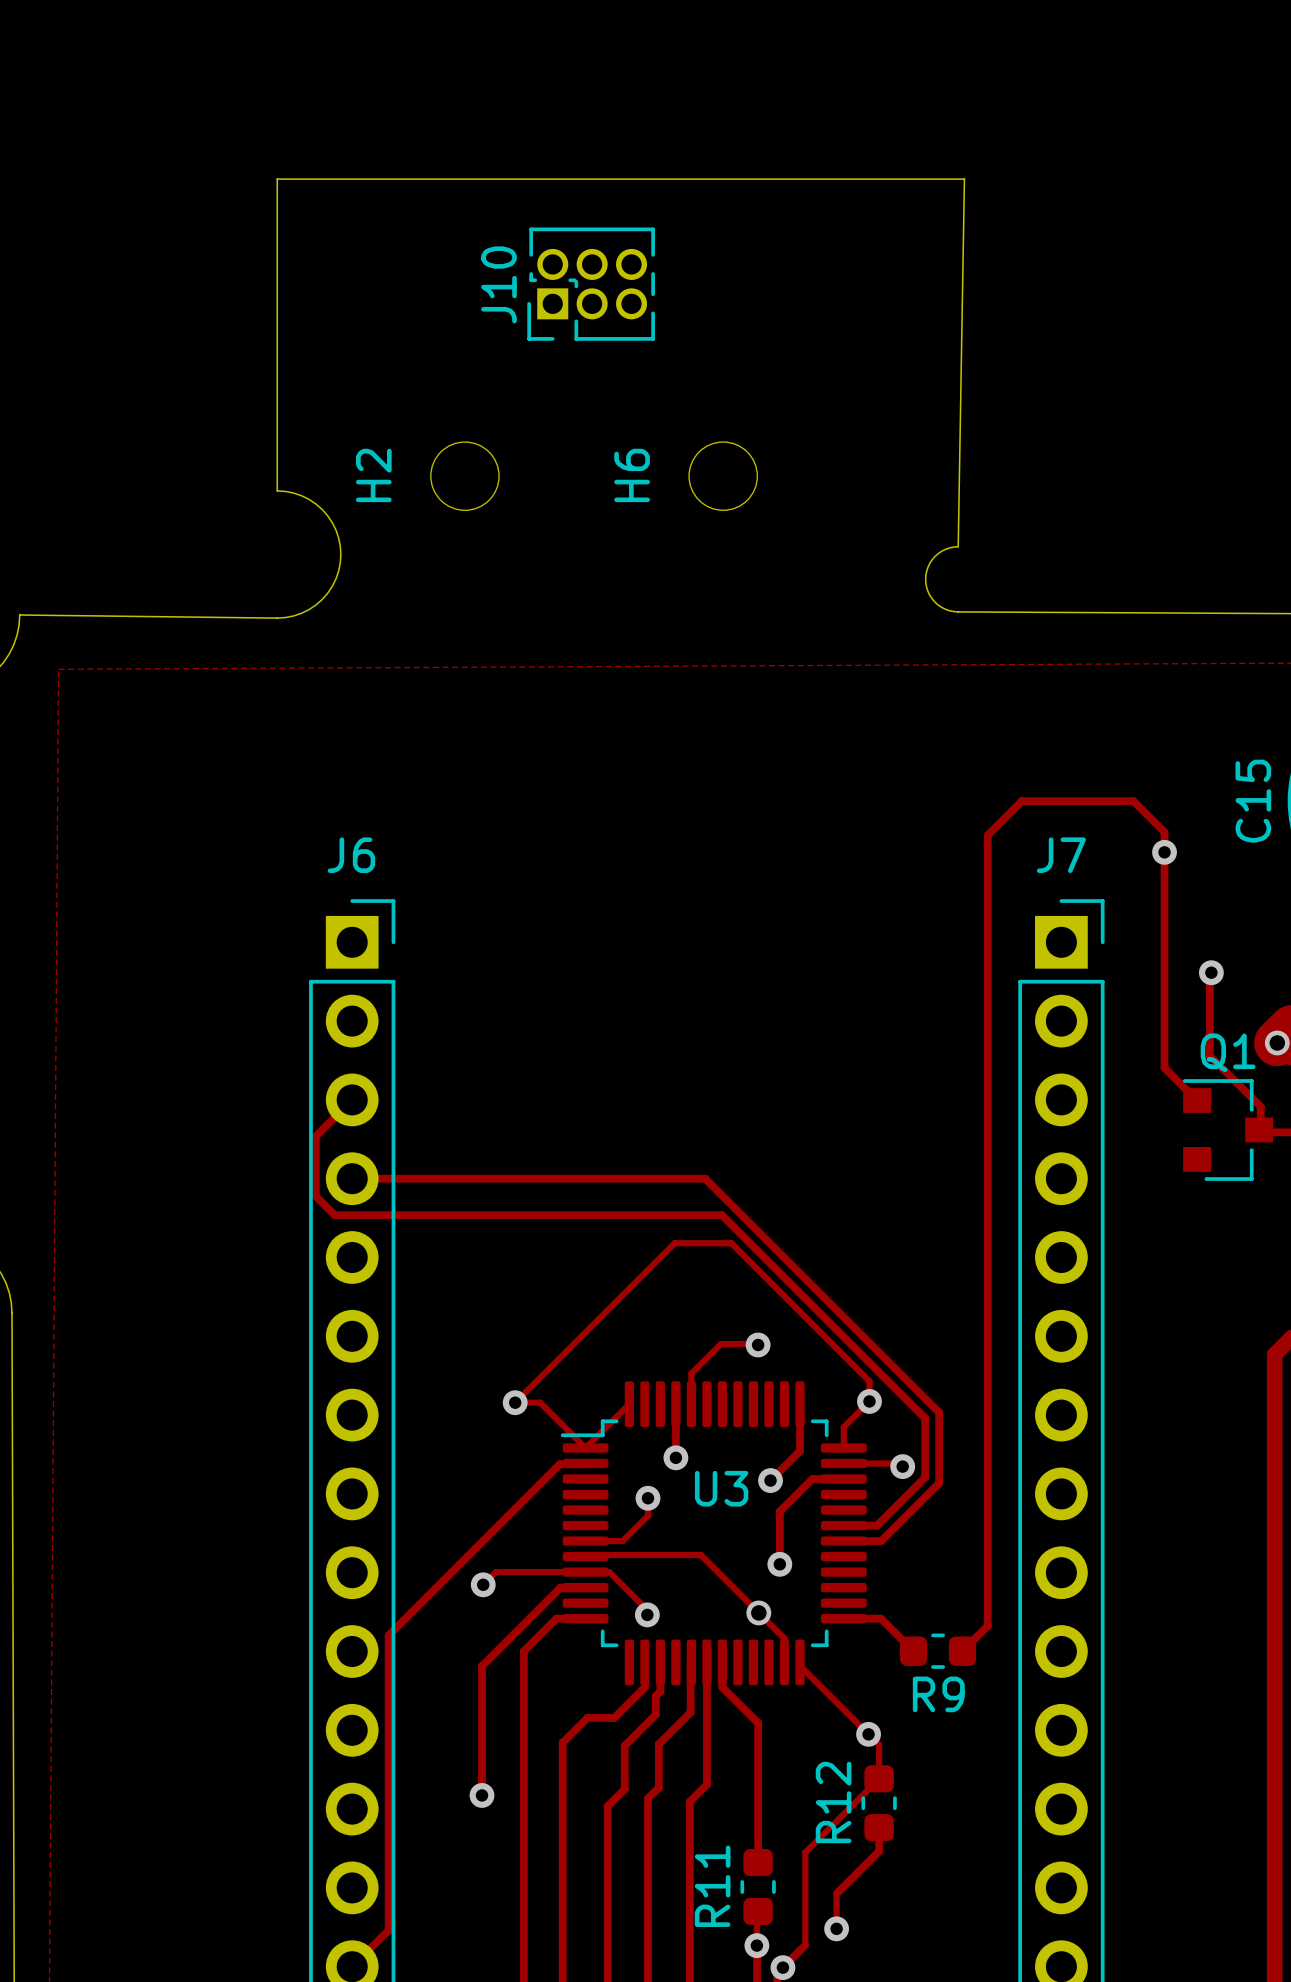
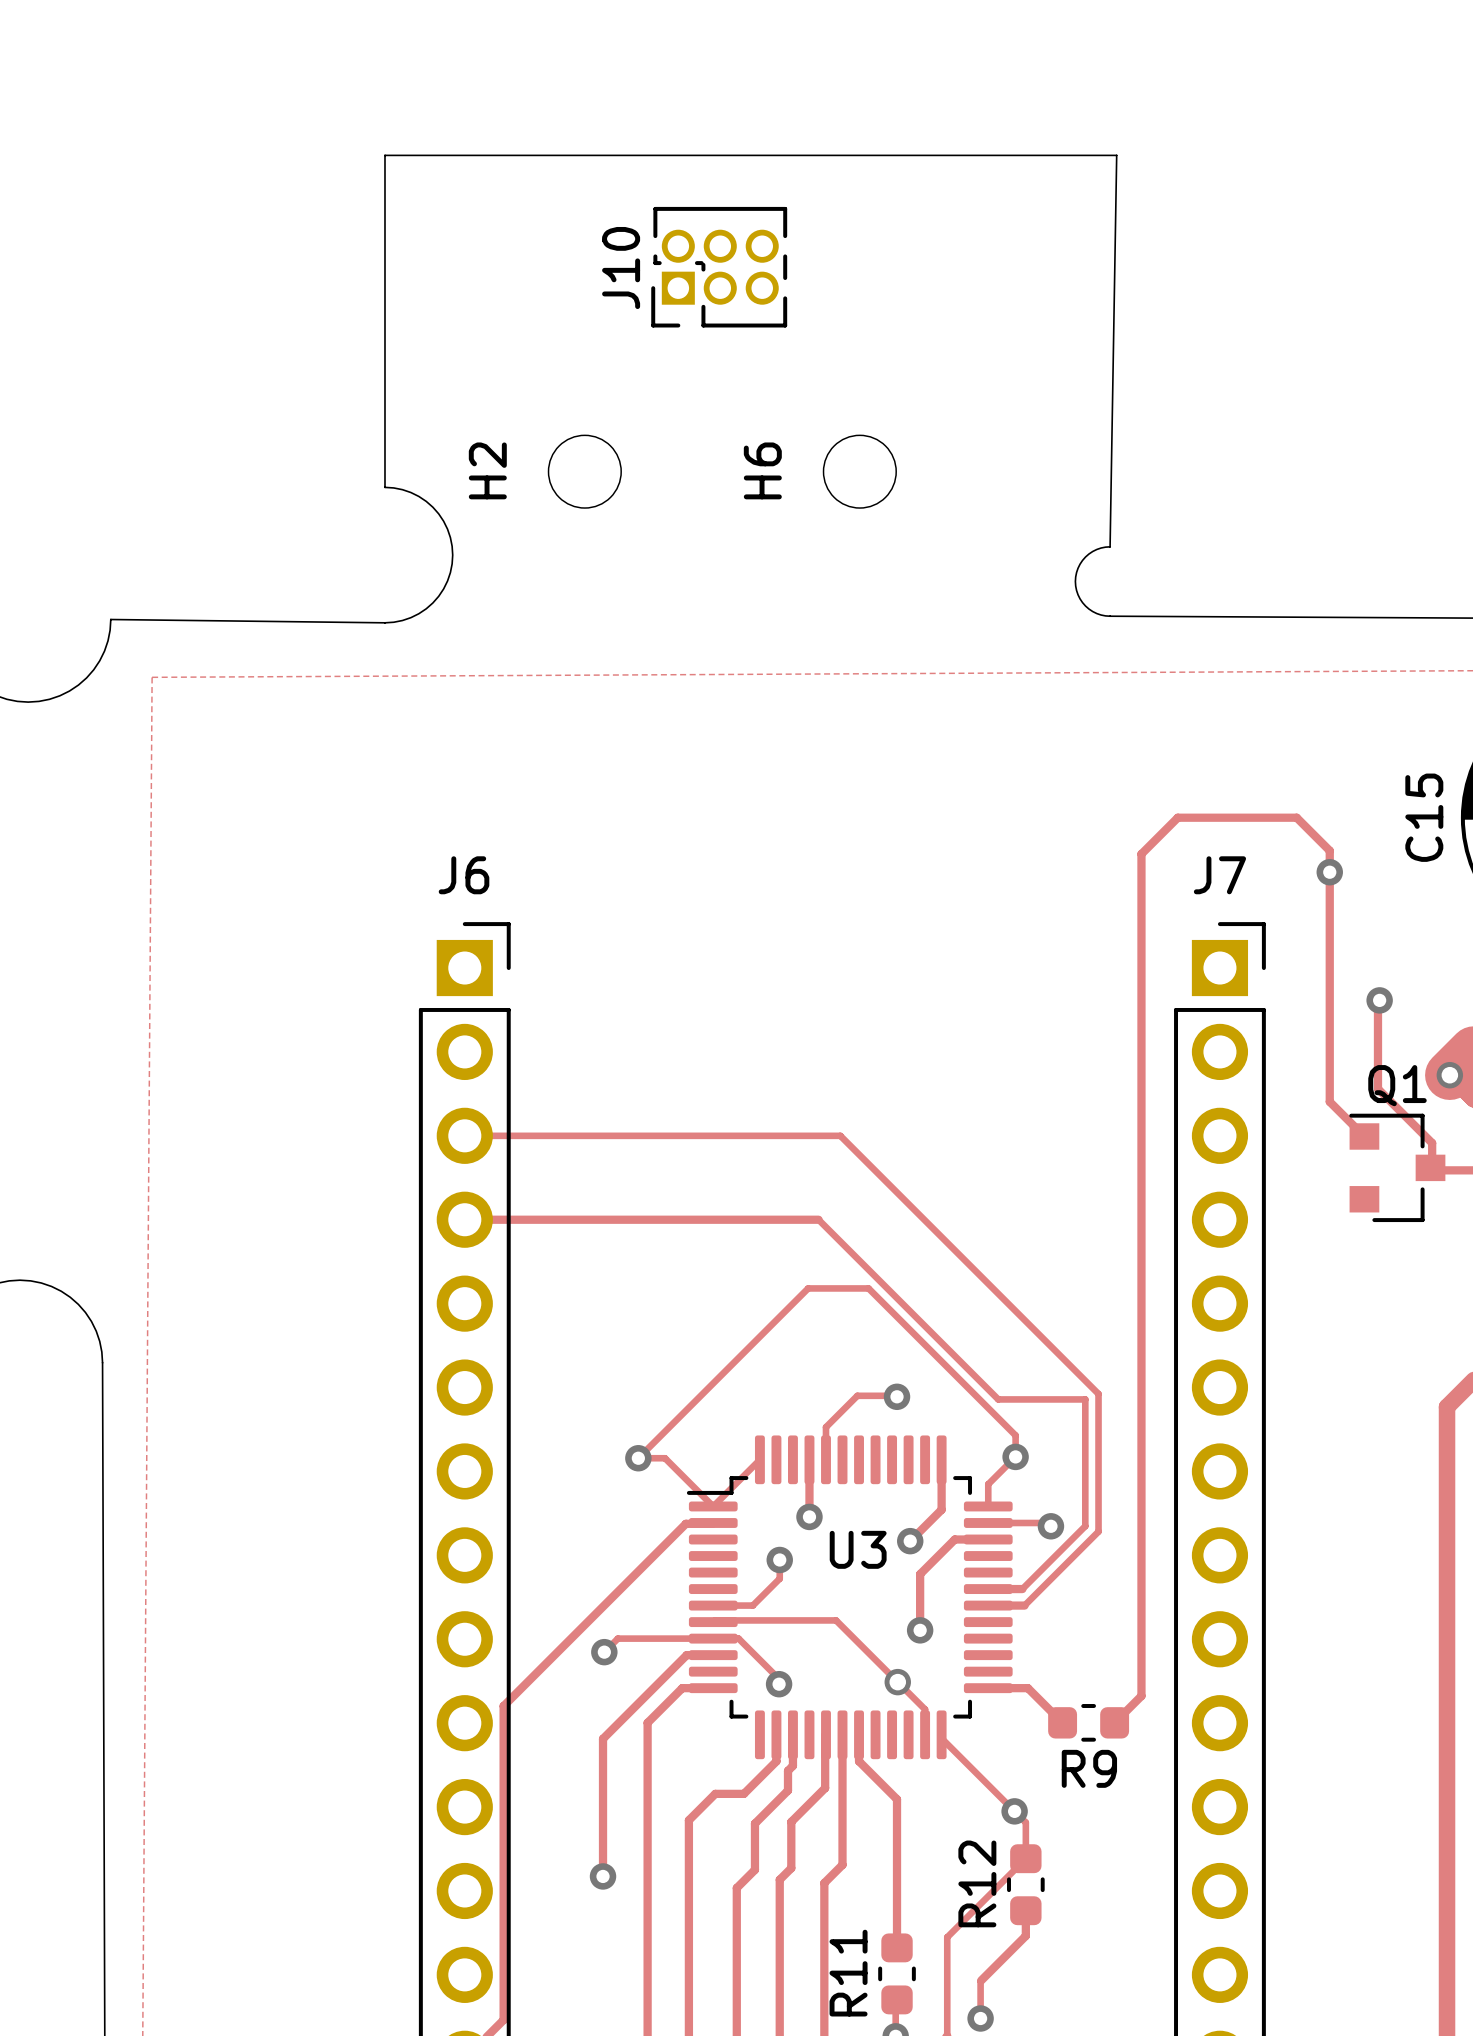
track: (352, 1099) (315, 1136) (315, 1196) (334, 1215) (722, 1215) (925, 1418) (925, 1477) (875, 1525) -> (464, 1135) (840, 1135) (1098, 1393) (1098, 1531) (1024, 1605)
track: (684, 1178) (705, 1178) (939, 1412) (939, 1483) (881, 1541) (877, 1541) -> (818, 1219) (998, 1399) (1085, 1399) (1085, 1526) (1022, 1589)

